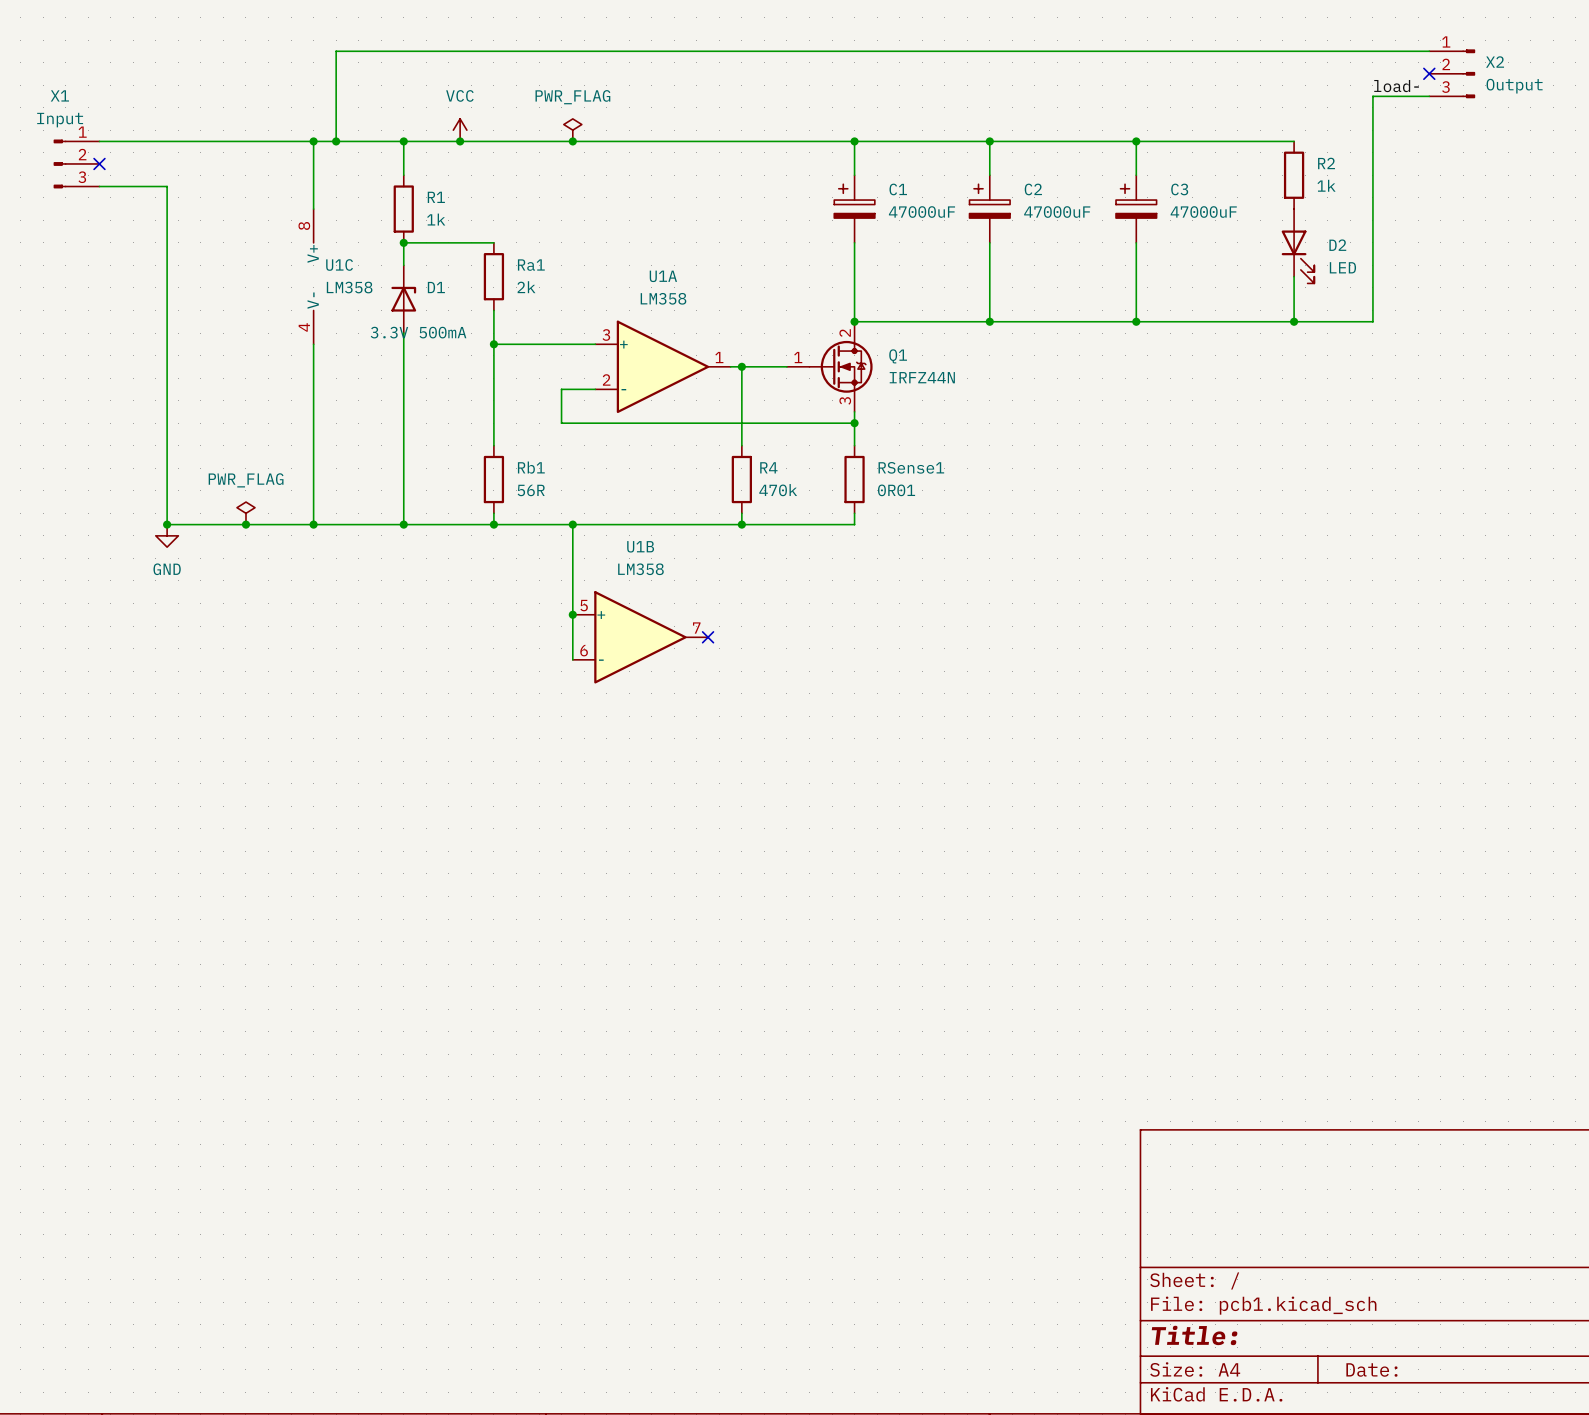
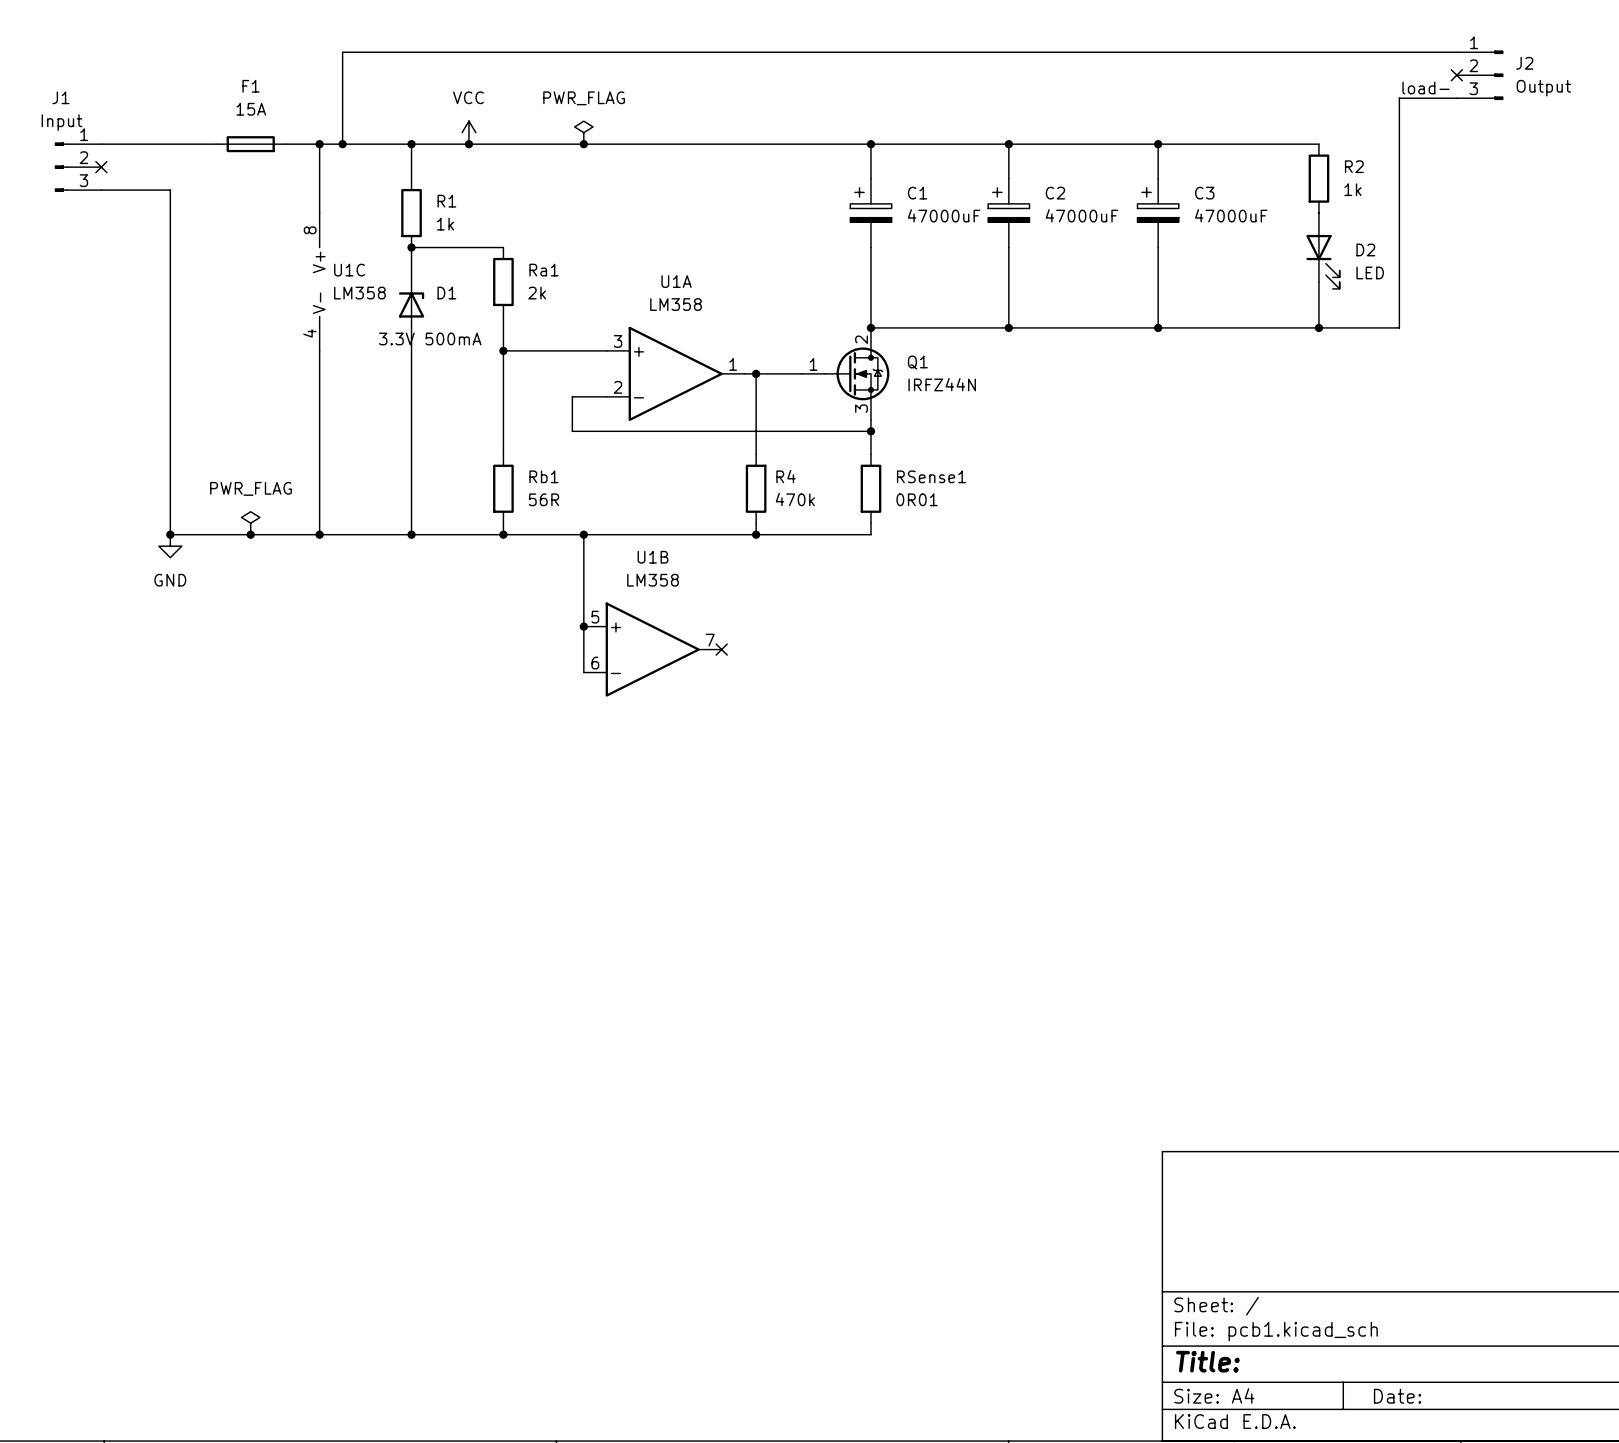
X2 name: X2 (1495, 62) -> J2 (1524, 63)
X1 name: X1 (59, 95) -> J1 (60, 97)
F1: none -> 15A (250, 144)

